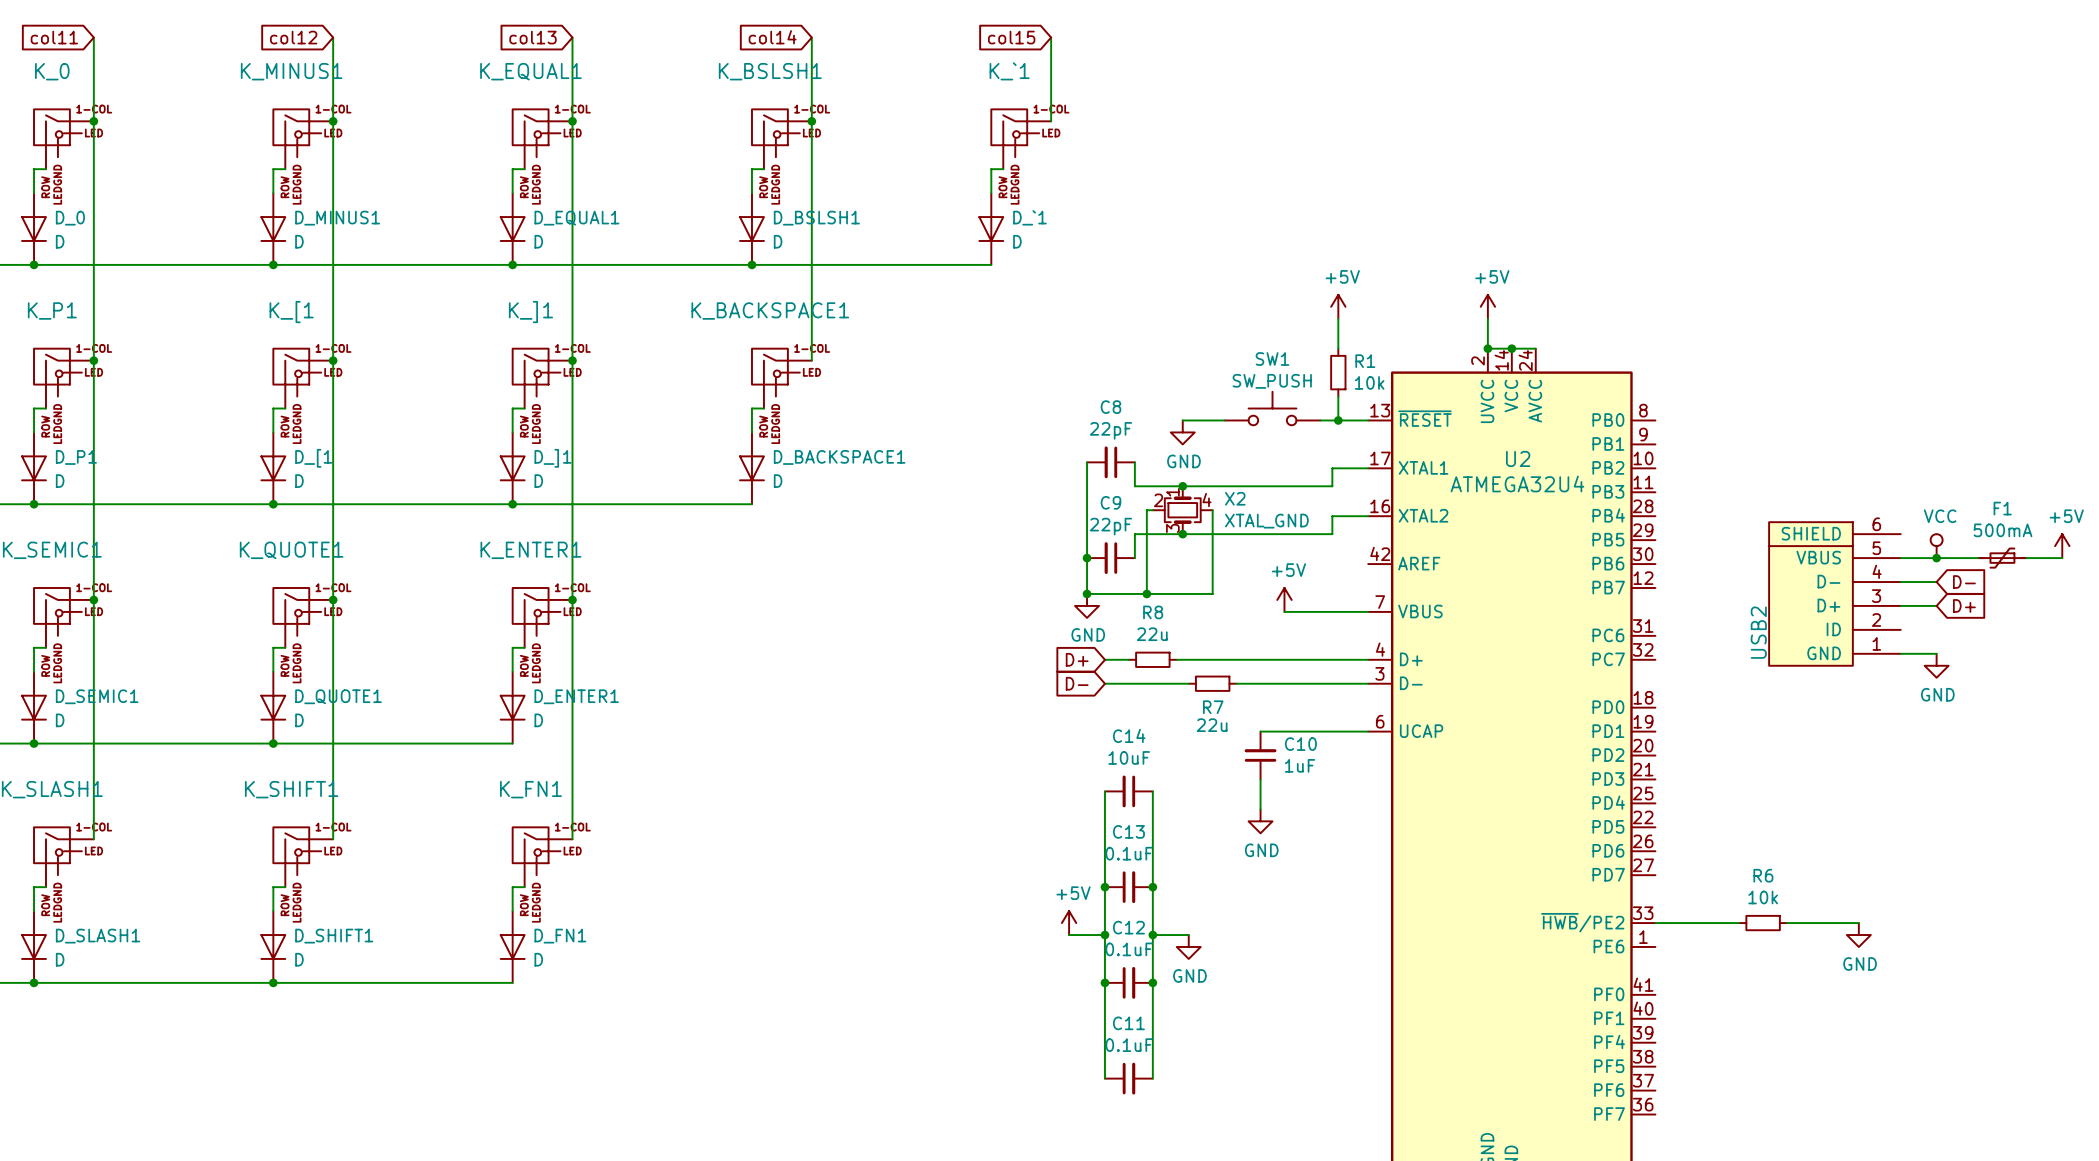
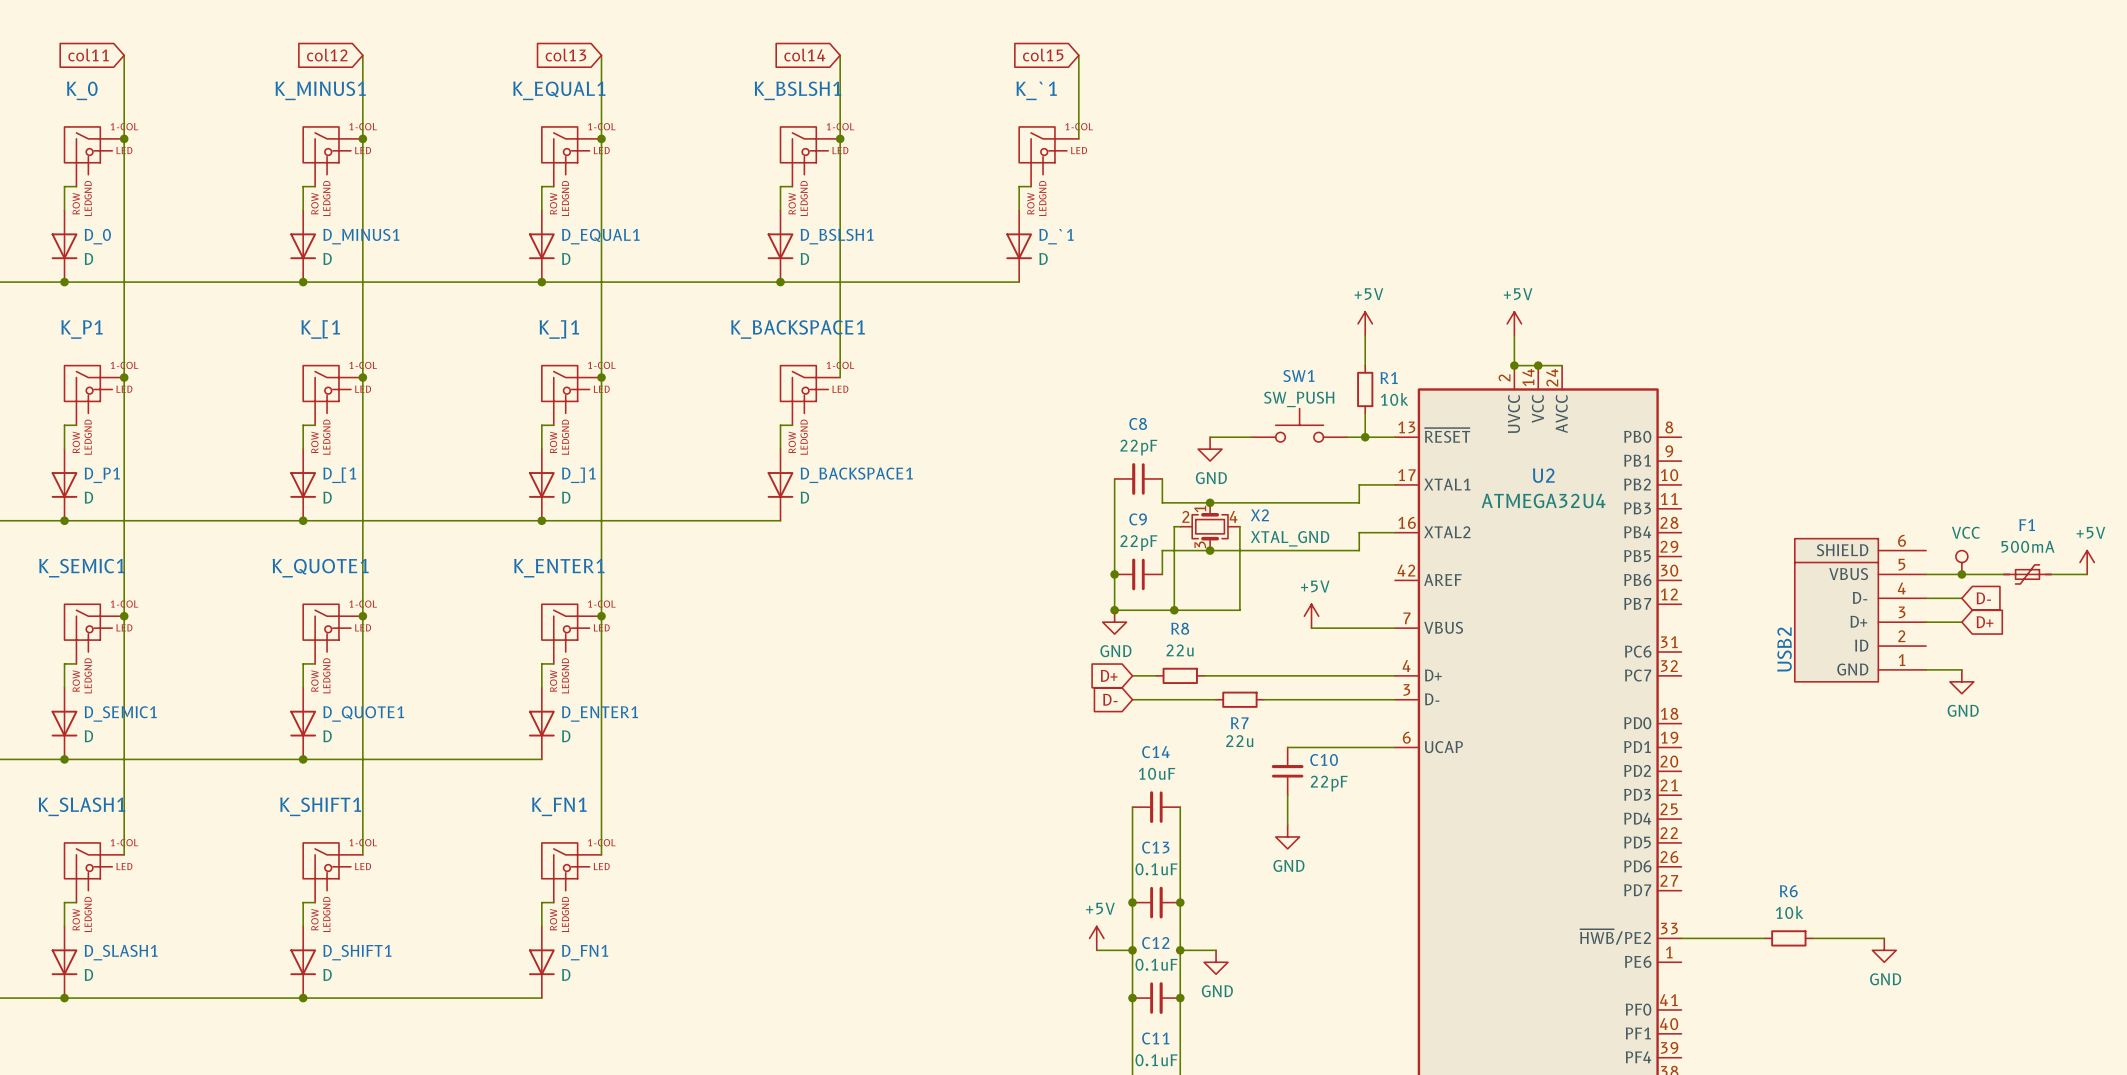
C10 value: 1uF (1300, 765) -> 22pF (1329, 783)

